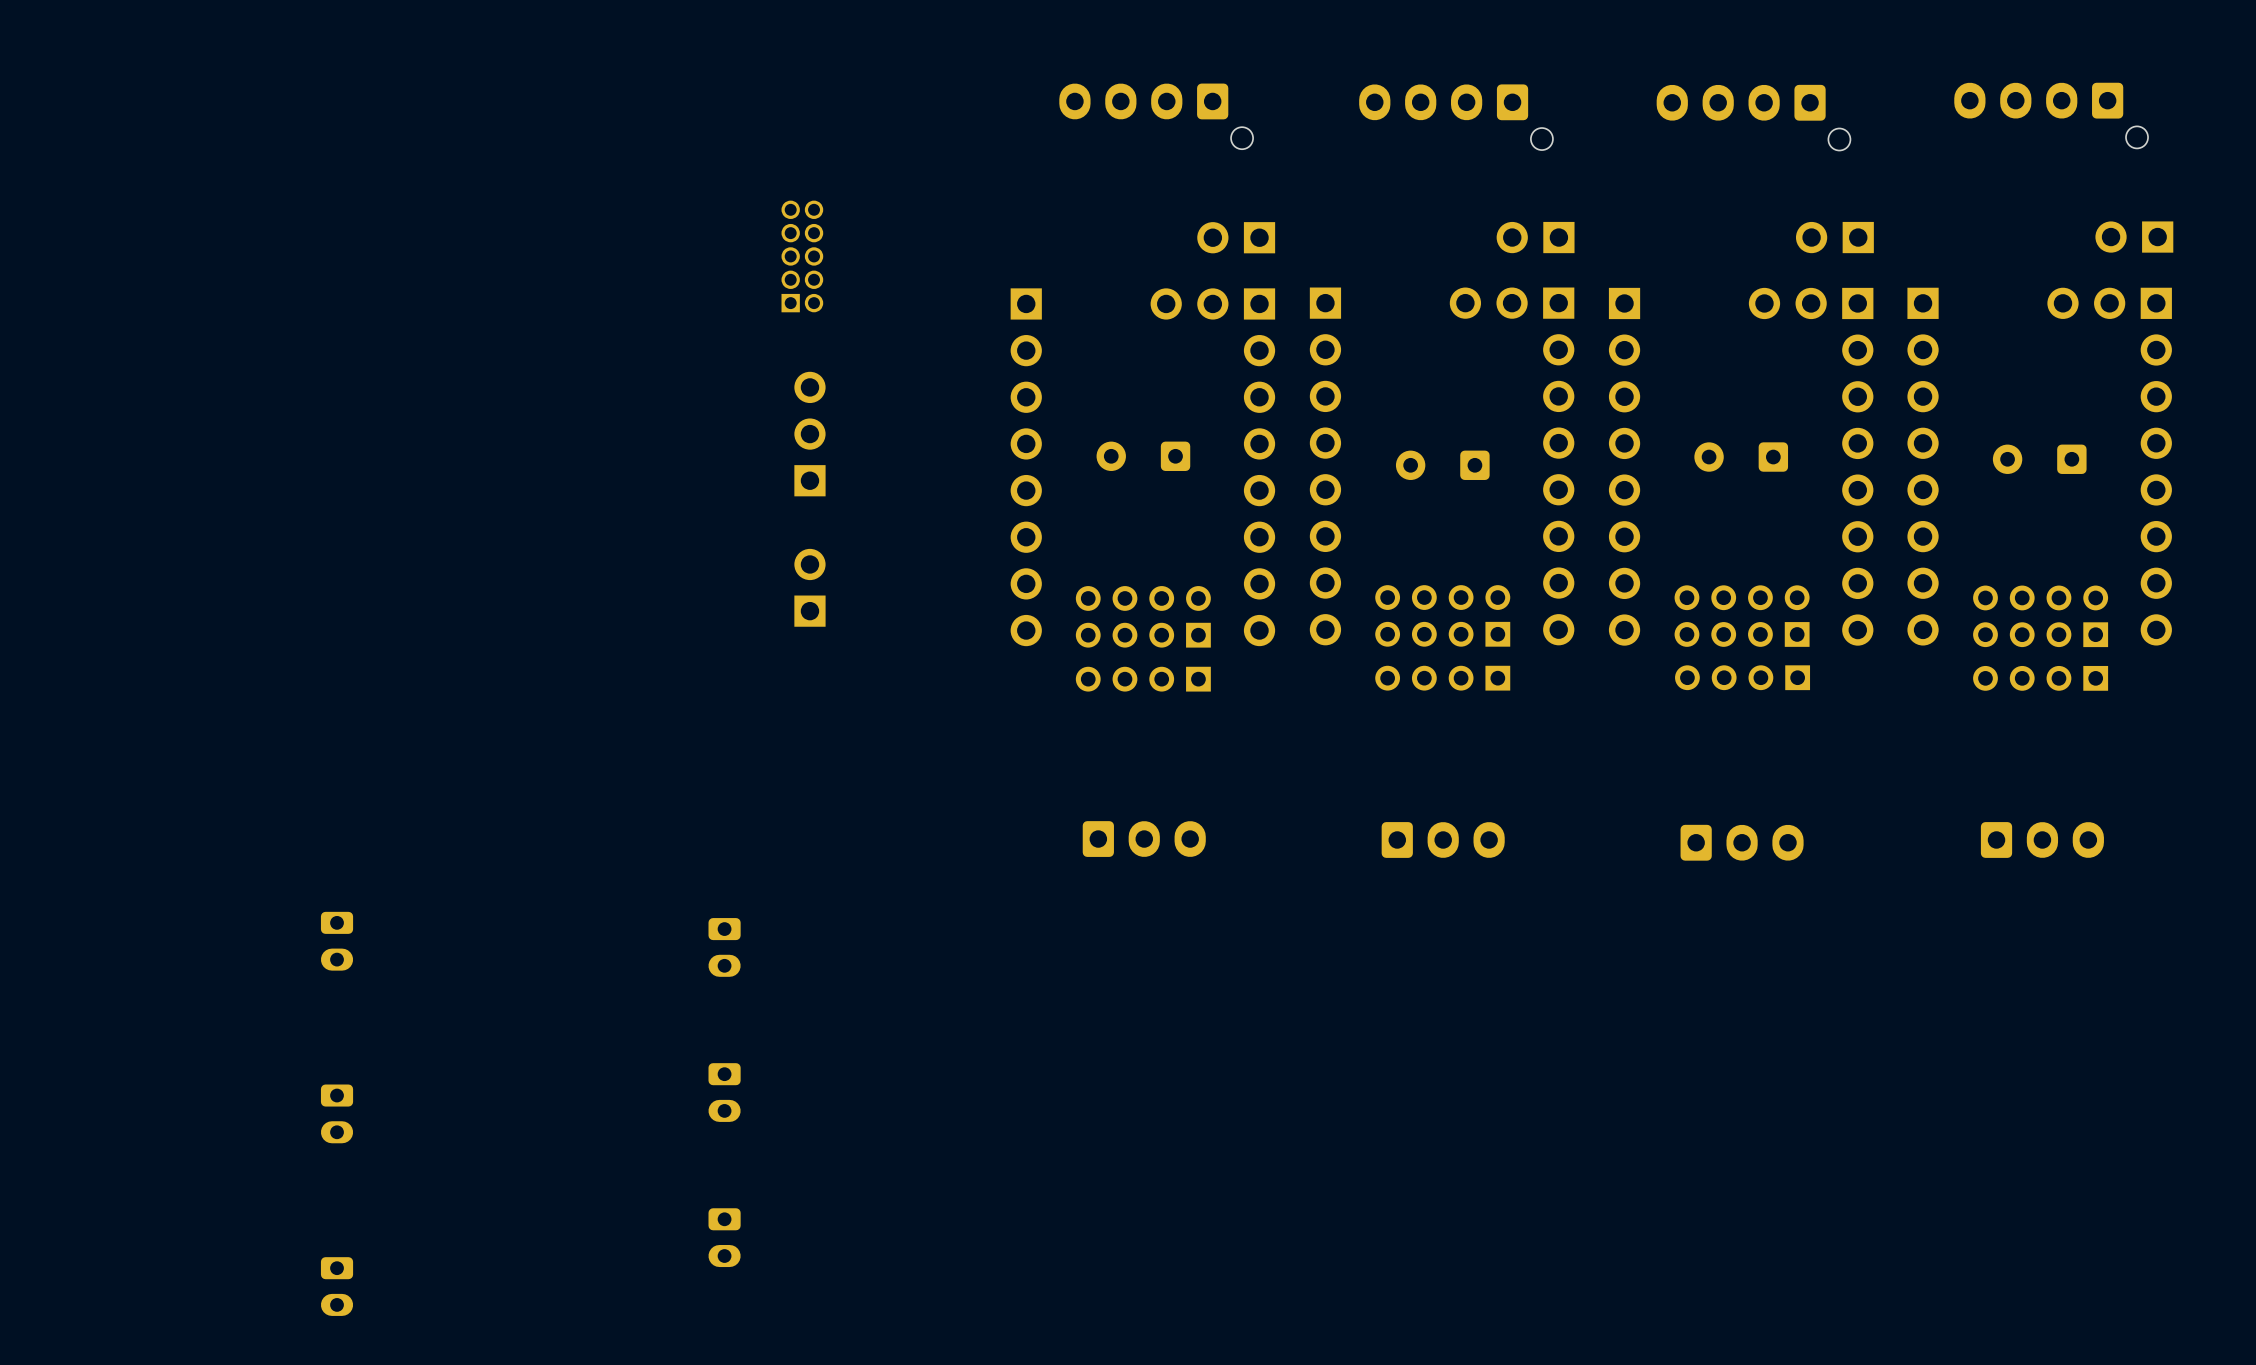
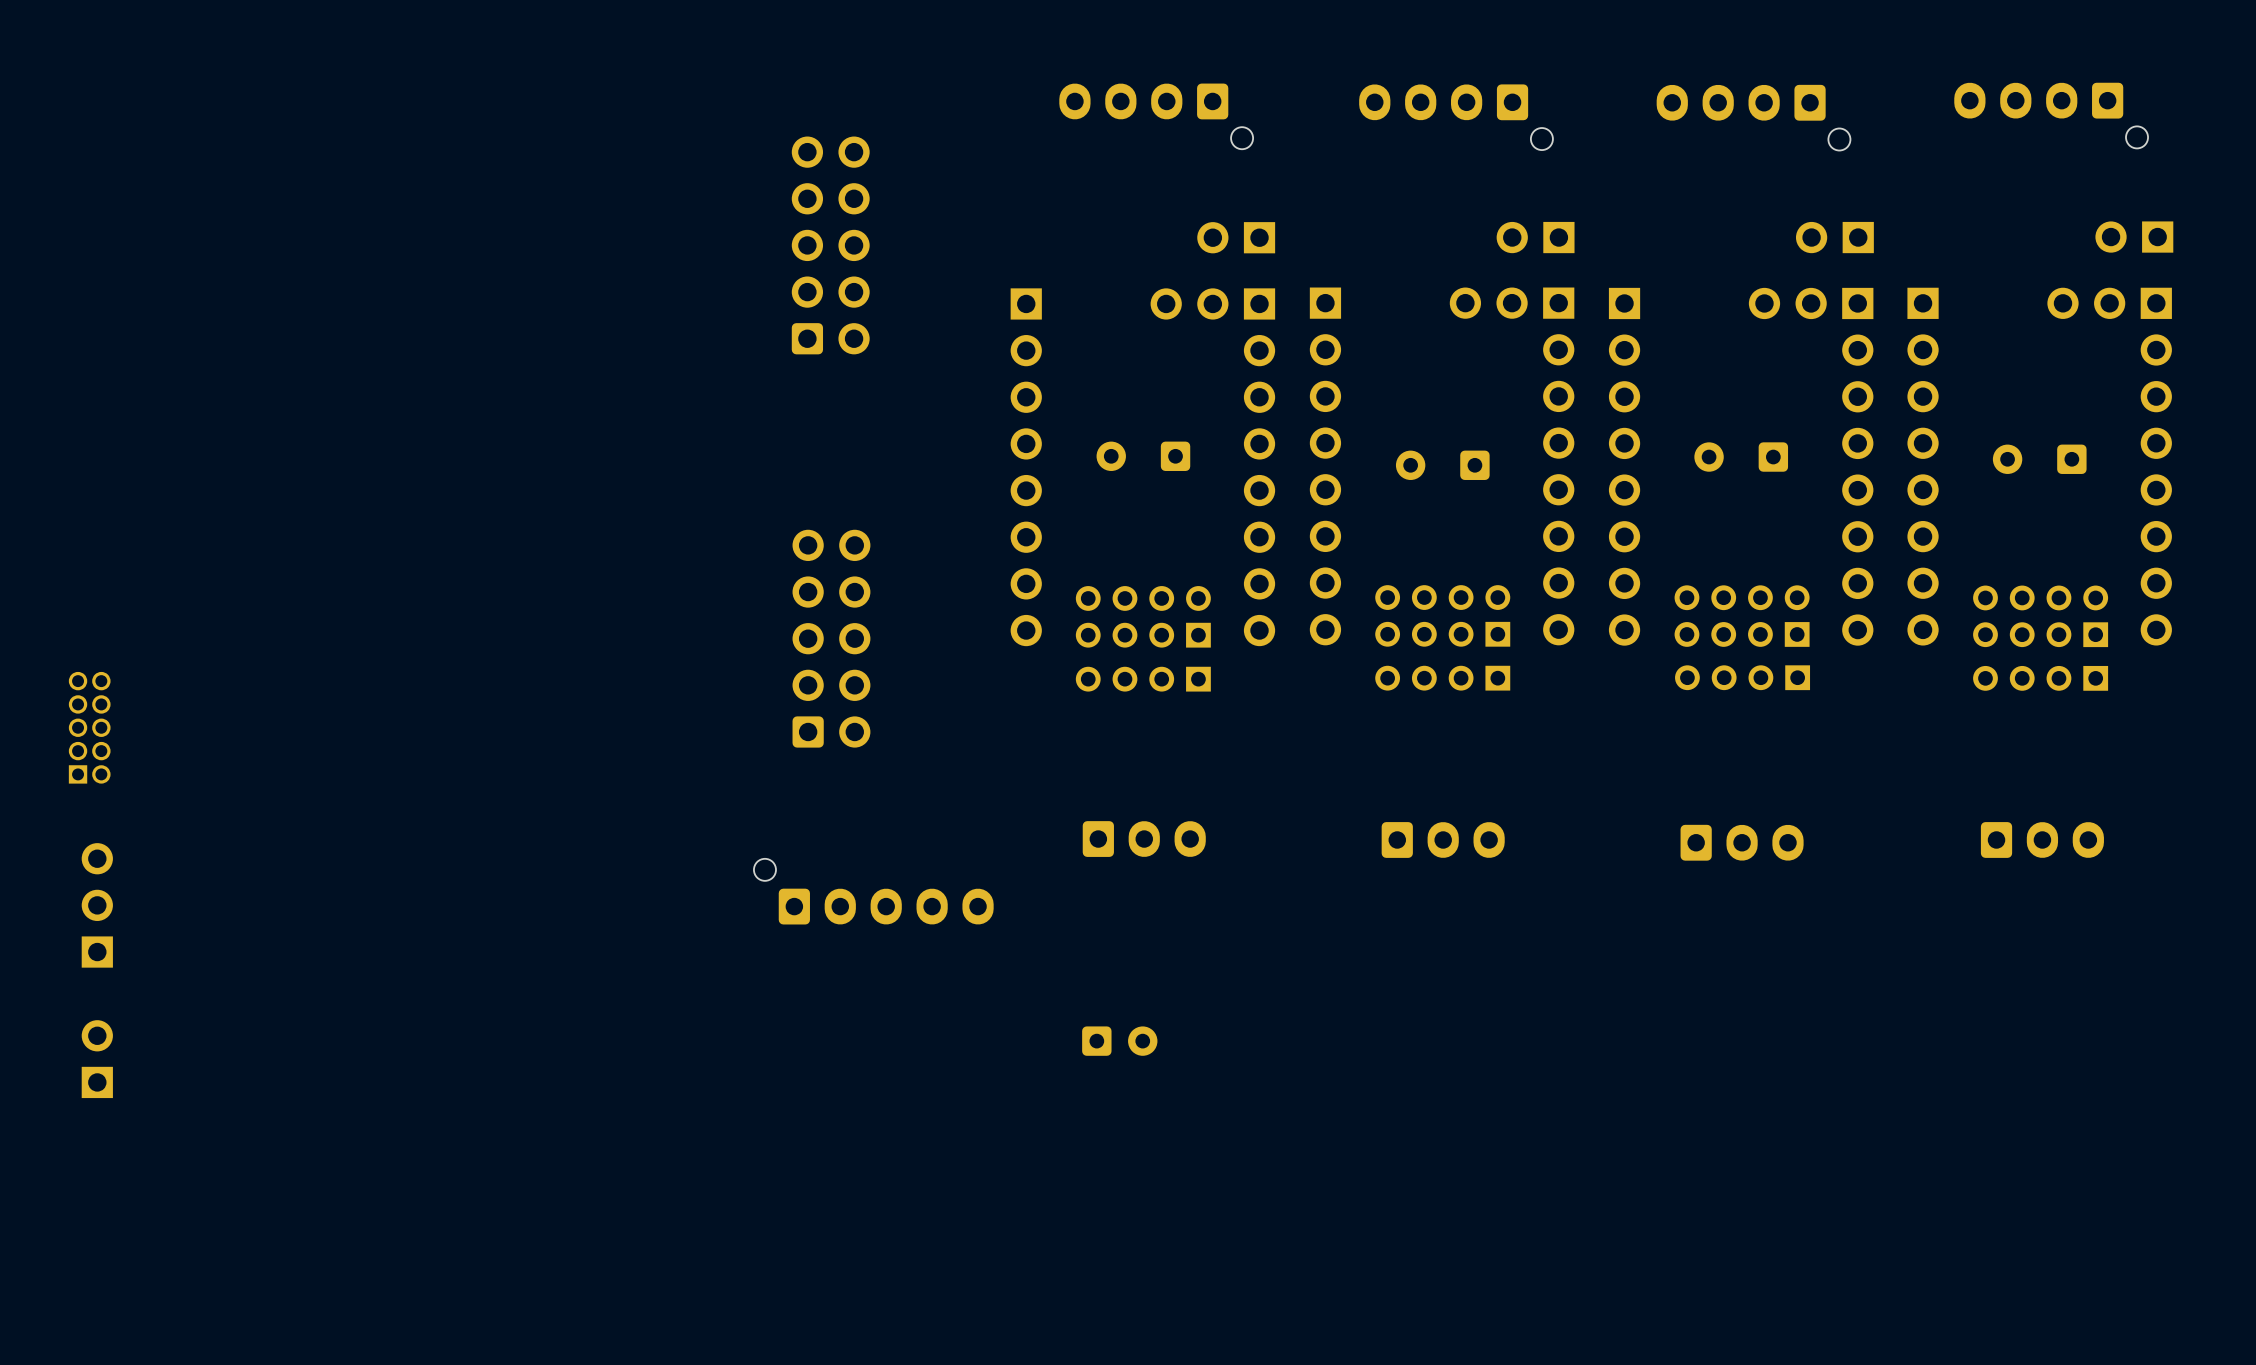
part: none -> (830, 245)
part: (802, 256) -> none
part: (809, 434) -> none
part: (809, 587) -> none
part: none -> (831, 638)
part: none -> (89, 727)
part: none -> (873, 891)
part: none -> (97, 905)
part: (337, 941) -> none
part: (724, 947) -> none
part: none -> (1119, 1041)
part: none -> (97, 1059)
part: (724, 1092) -> none
part: (337, 1113) -> none
part: (724, 1237) -> none
part: (337, 1286) -> none

